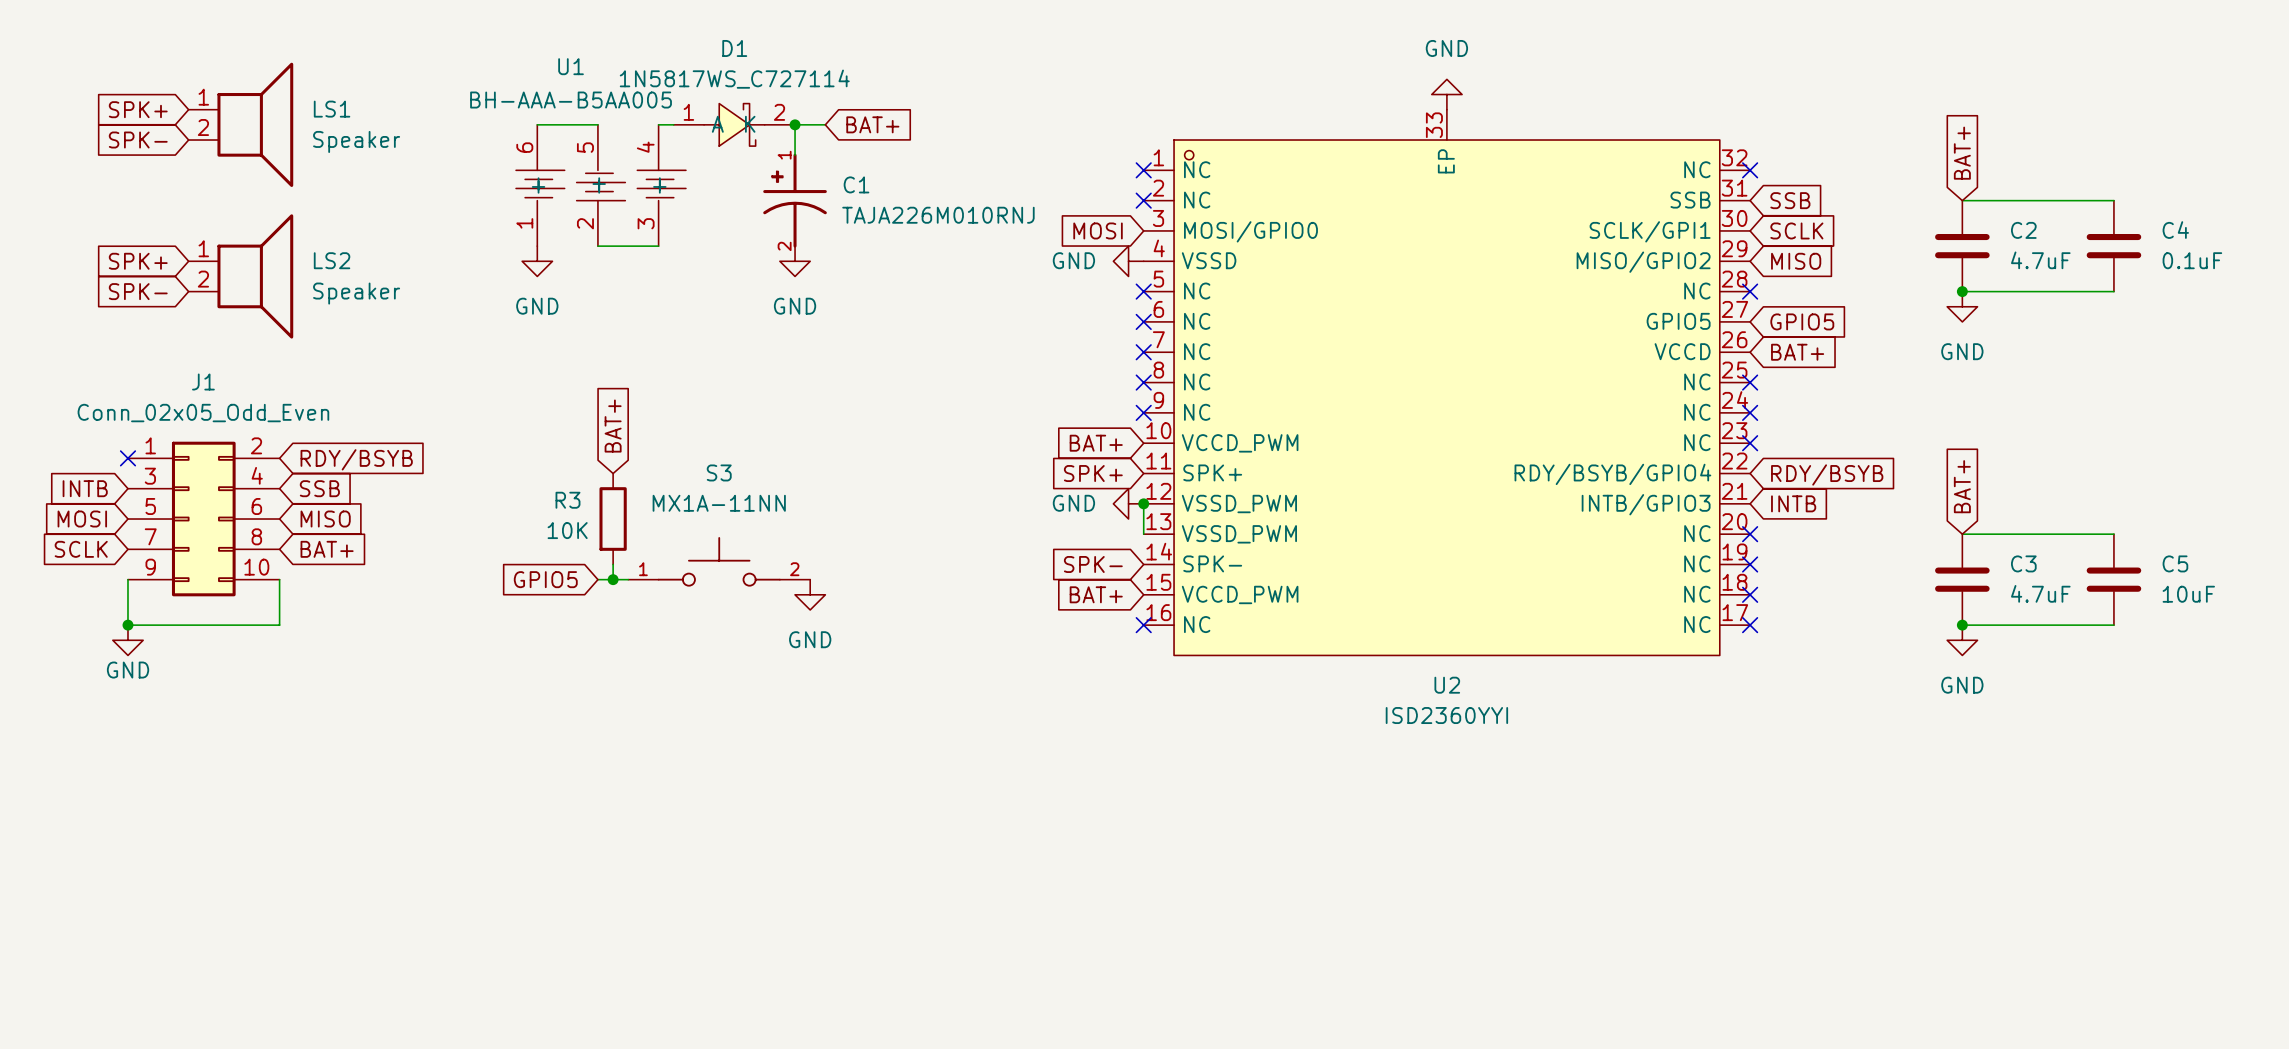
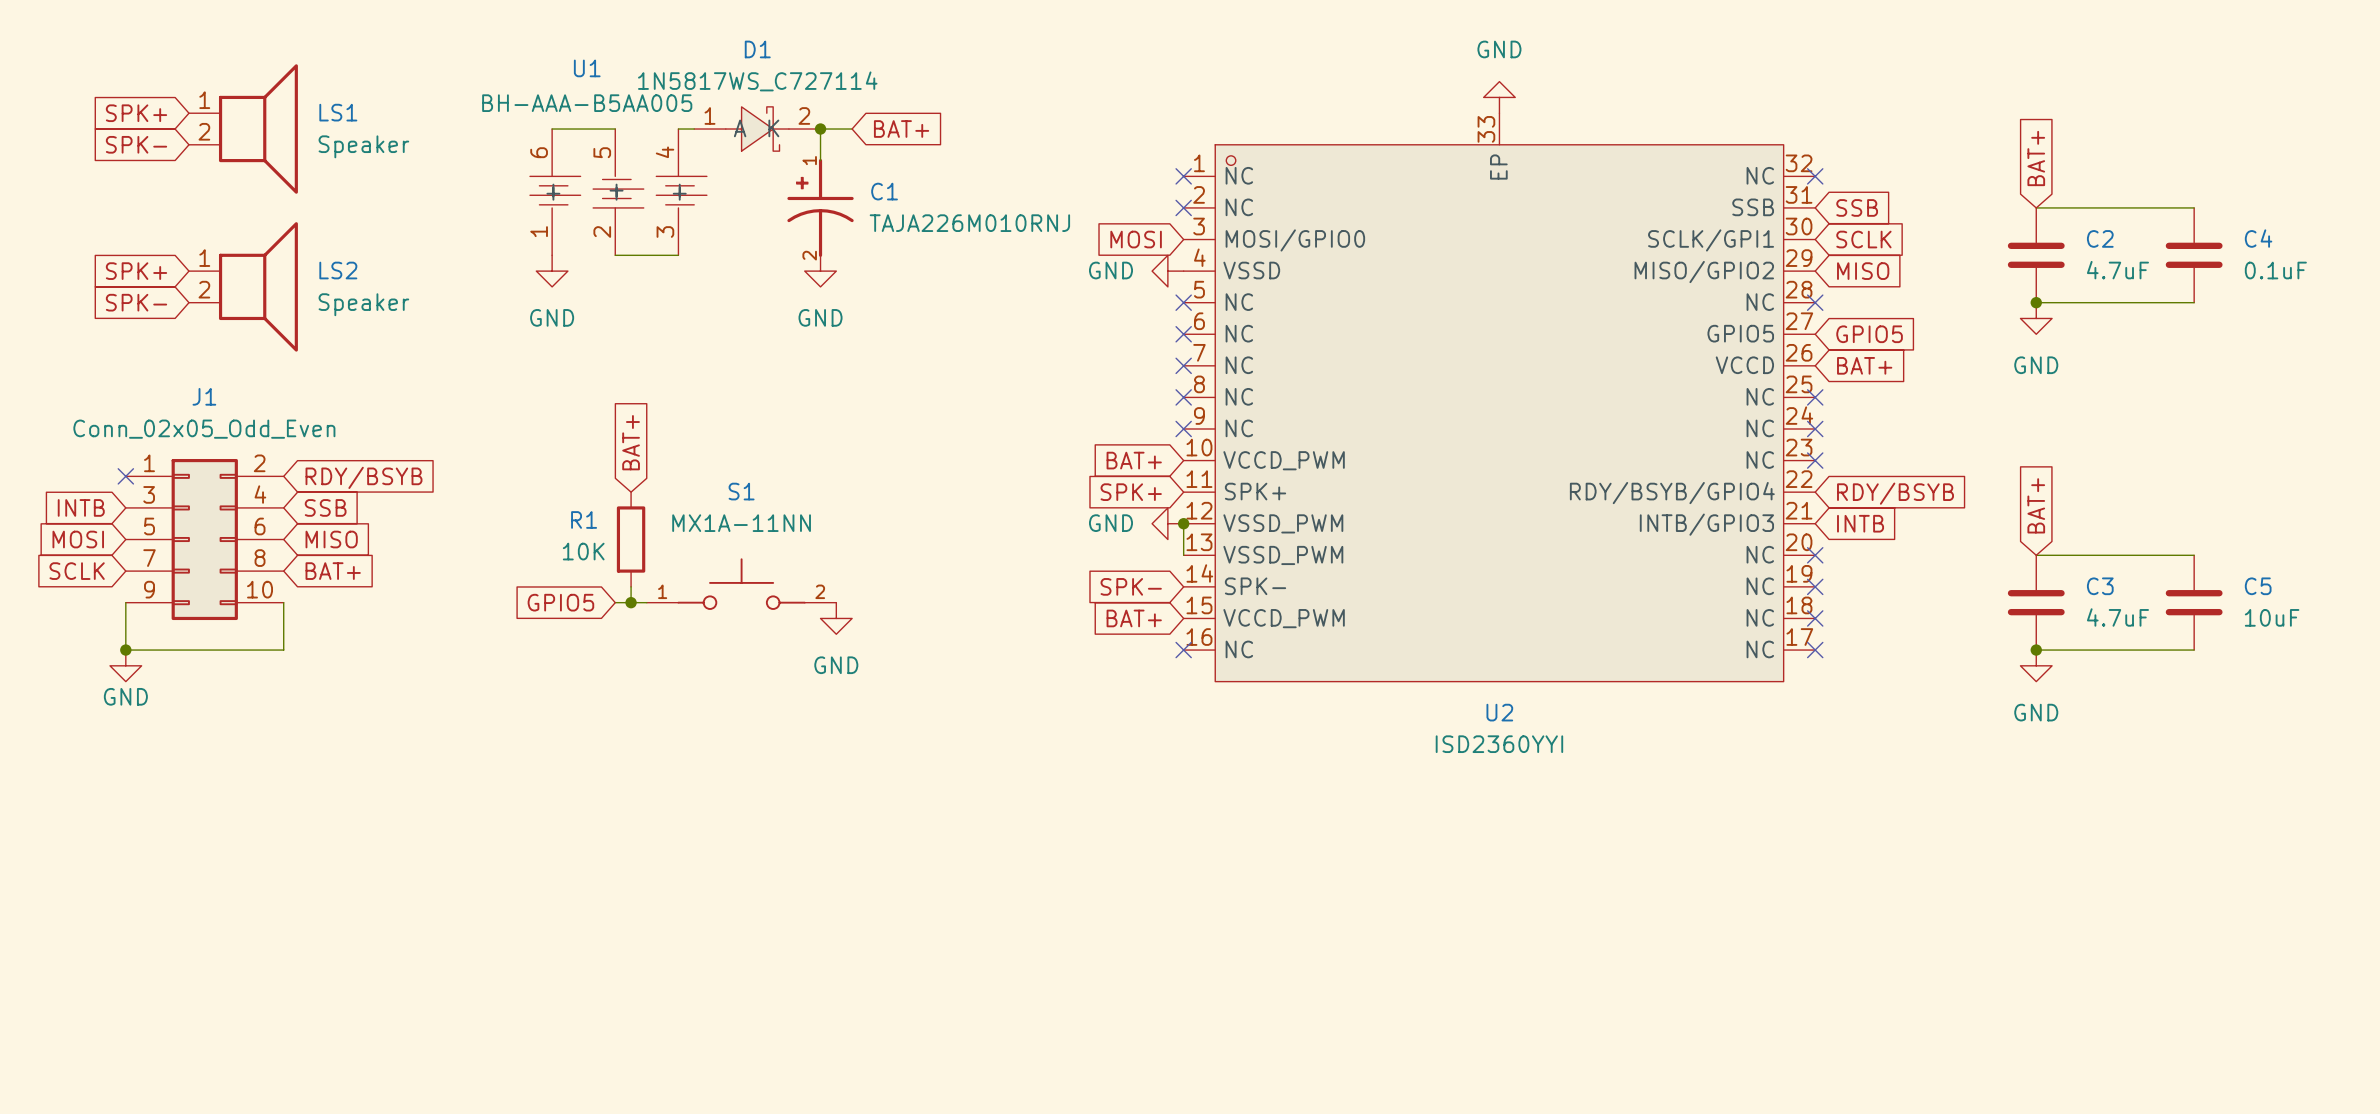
S3 name: S3 (719, 472) -> S1 (741, 491)
R3 name: R3 (567, 500) -> R1 (584, 519)

